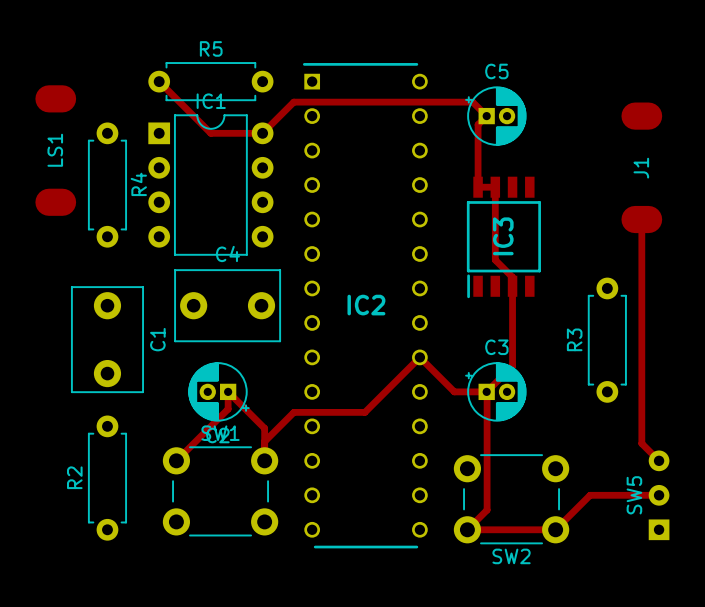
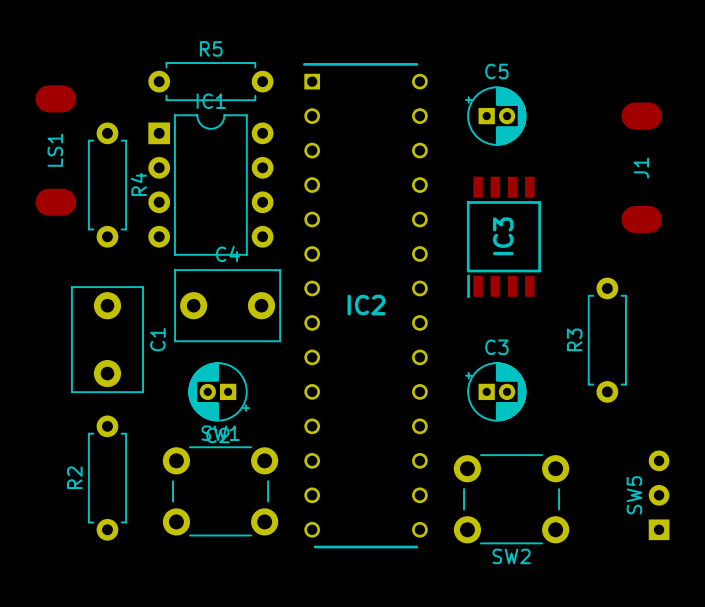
top track: (159, 81) (210, 133) (262, 133) (293, 102) (472, 102) (486, 116) (478, 124) (478, 187) (495, 187) (495, 260) (512, 277) (512, 366) (486, 391) -> none
top track: (641, 219) (641, 443) (659, 460) -> none
top track: (486, 391) (487, 510) (467, 529) (555, 529) (590, 495) (659, 495) -> none
top track: (486, 391) (454, 391) (419, 357) (364, 412) (293, 412) (264, 441) -> none
top track: (176, 460) (228, 409) (228, 391) (264, 428) (264, 460) -> none

